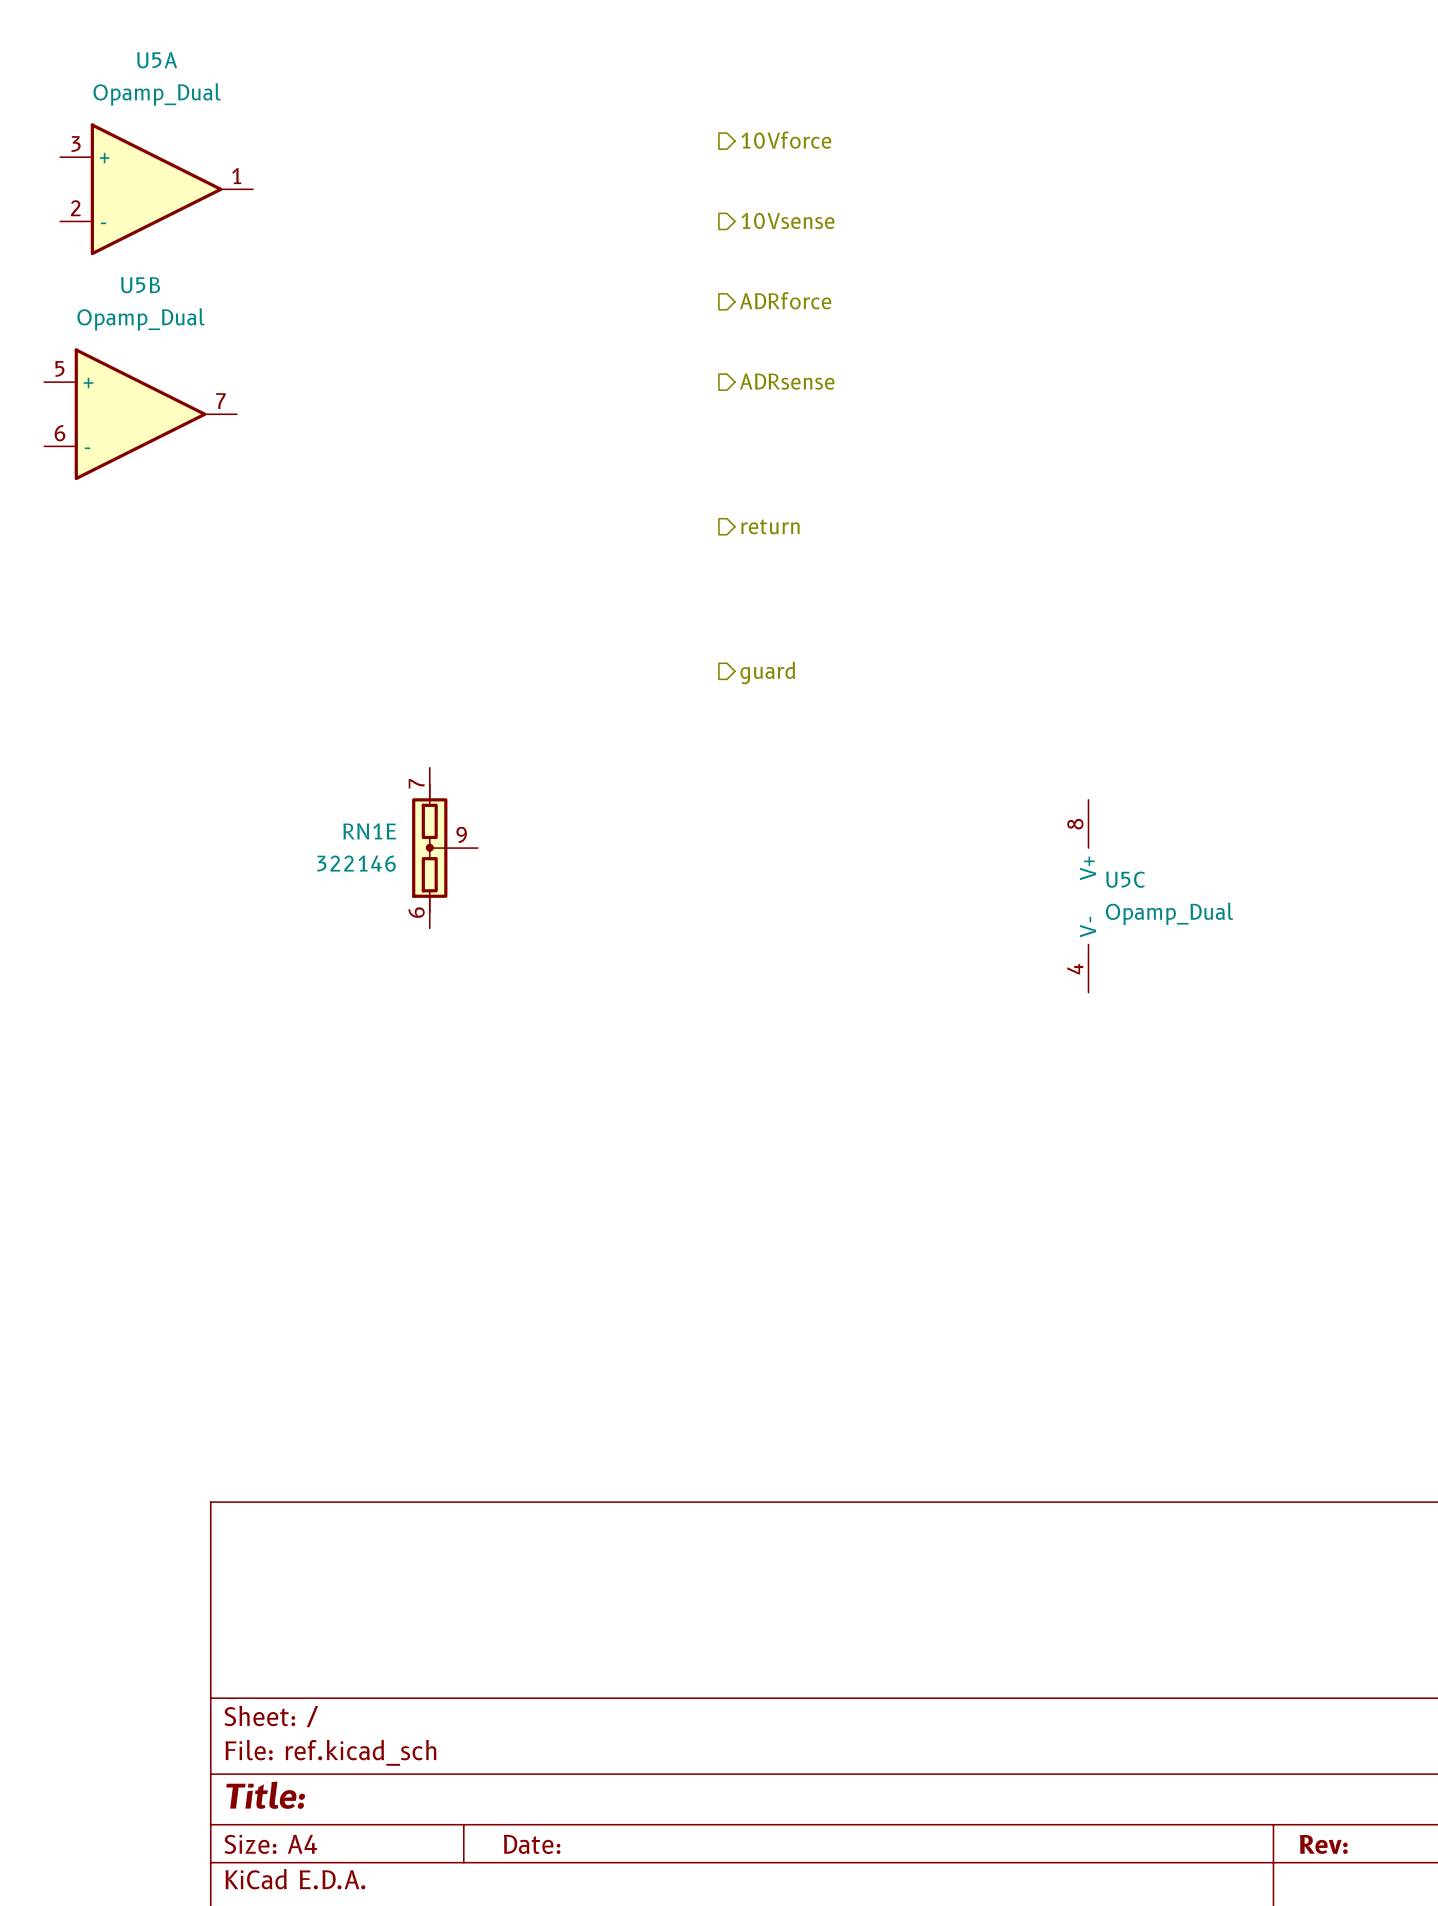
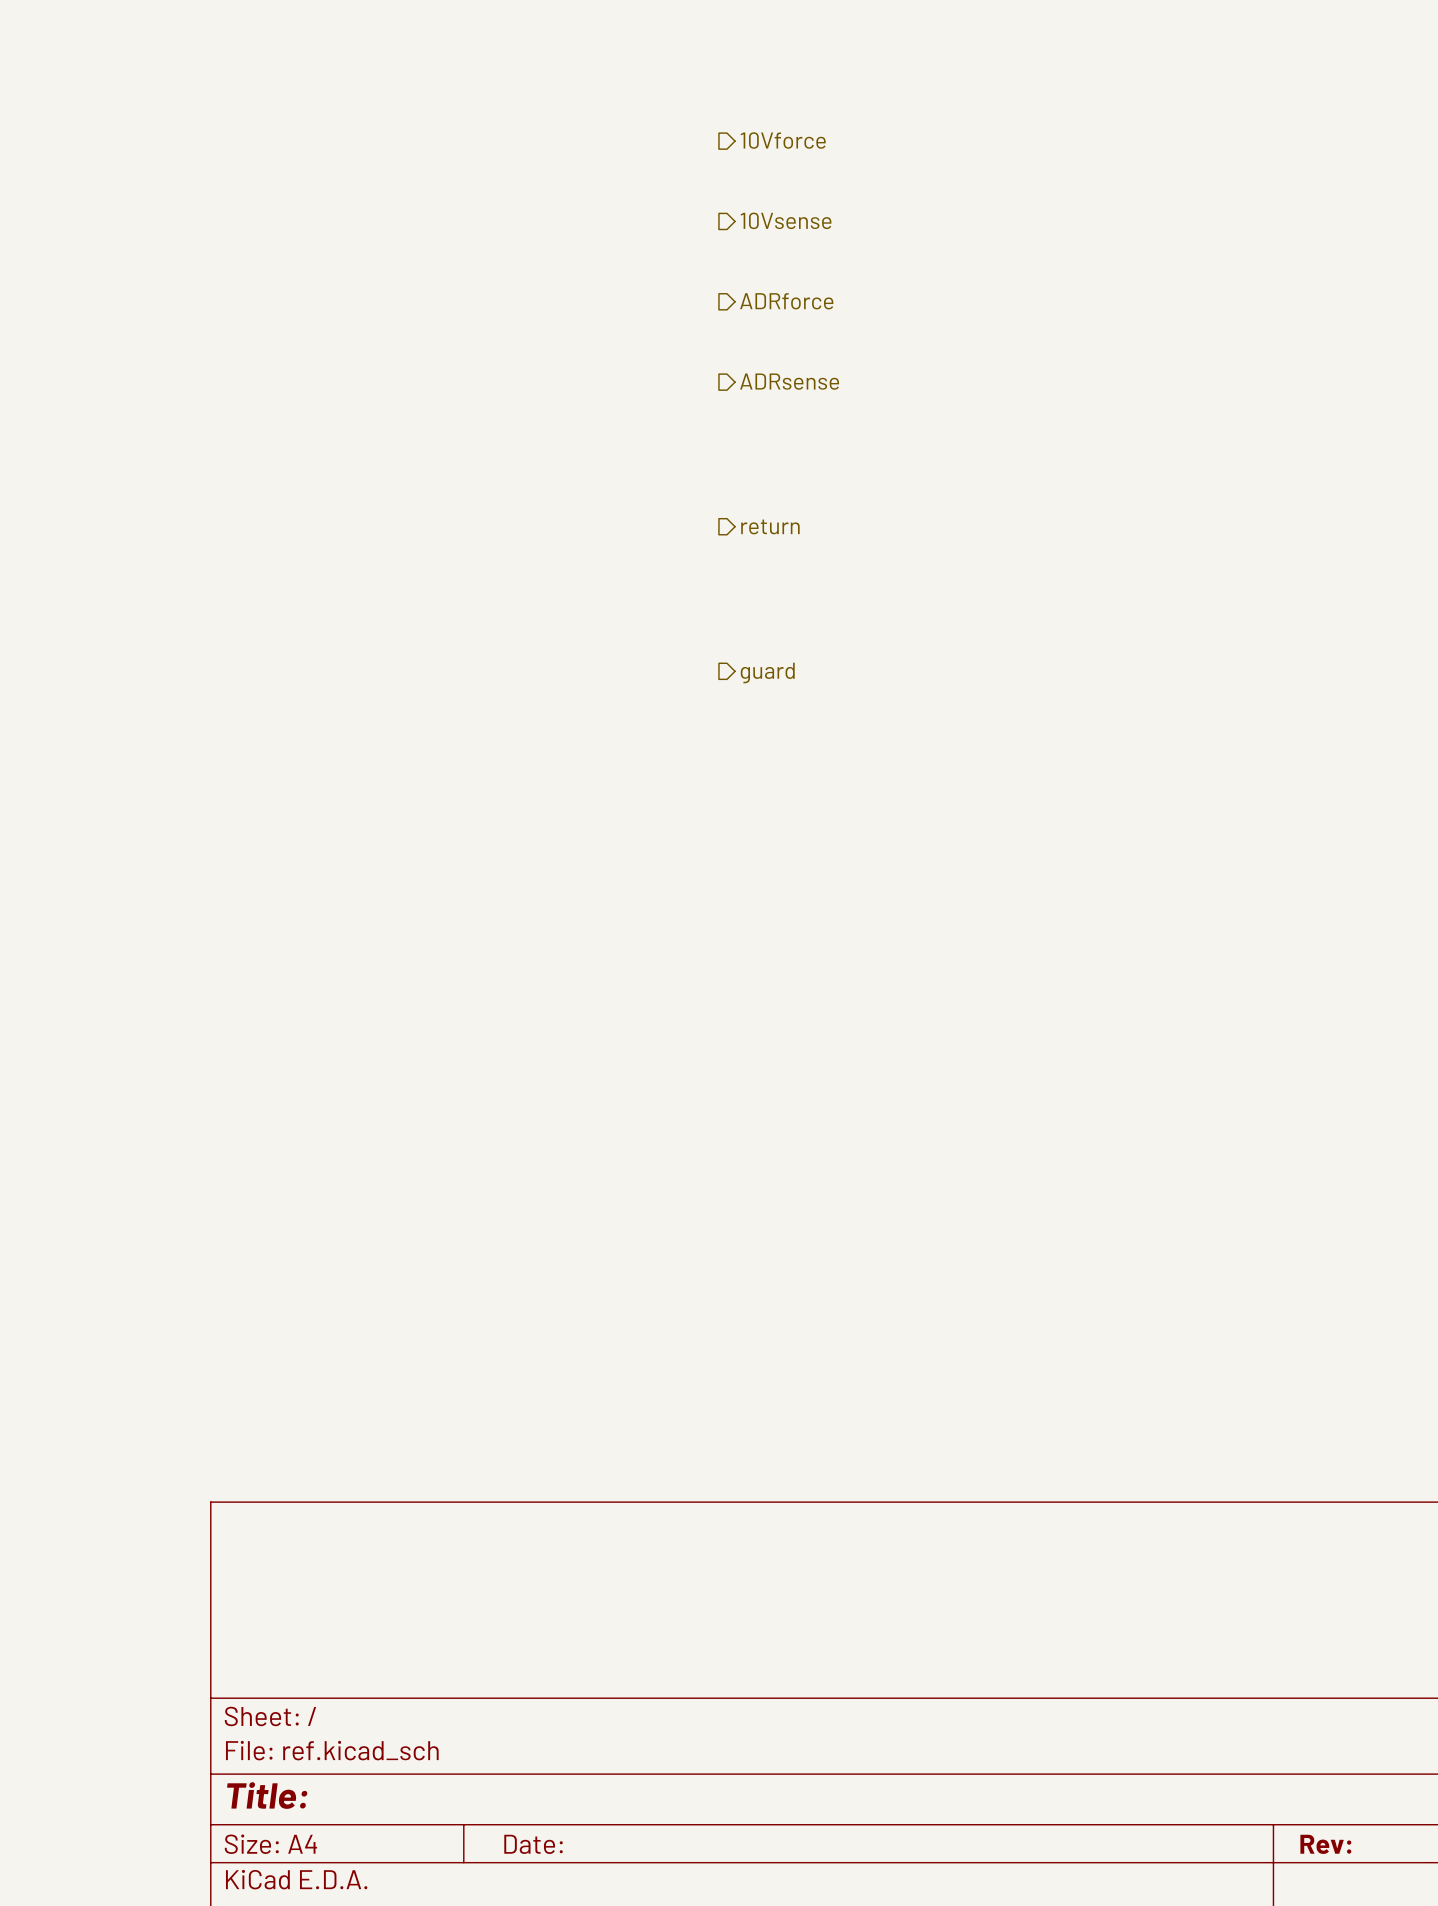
U5A: Opamp_Dual (156, 189) -> none
U5B: Opamp_Dual (140, 414) -> none
RN1E: 322146 (445, 848) -> none
U5C: Opamp_Dual (1088, 896) -> none

